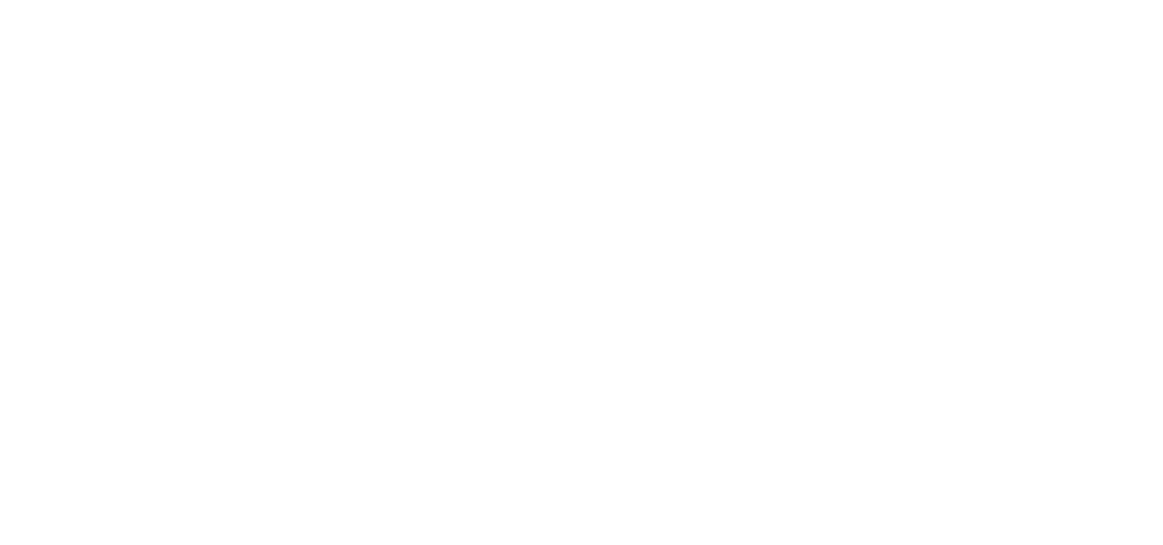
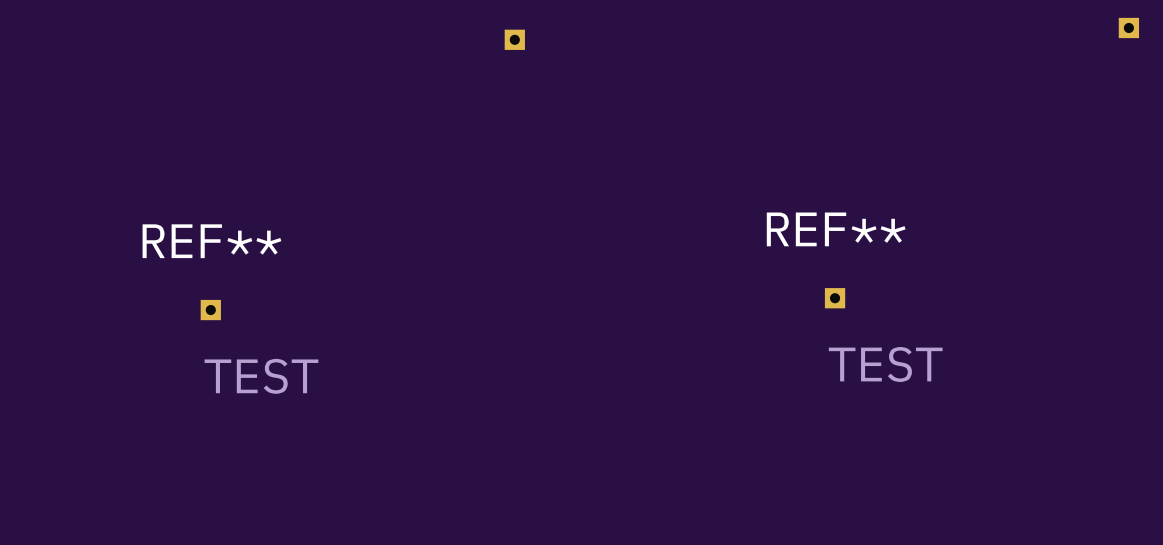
REF**: none -> TEST (981, 163)
REF**: none -> TEST (362, 174)

